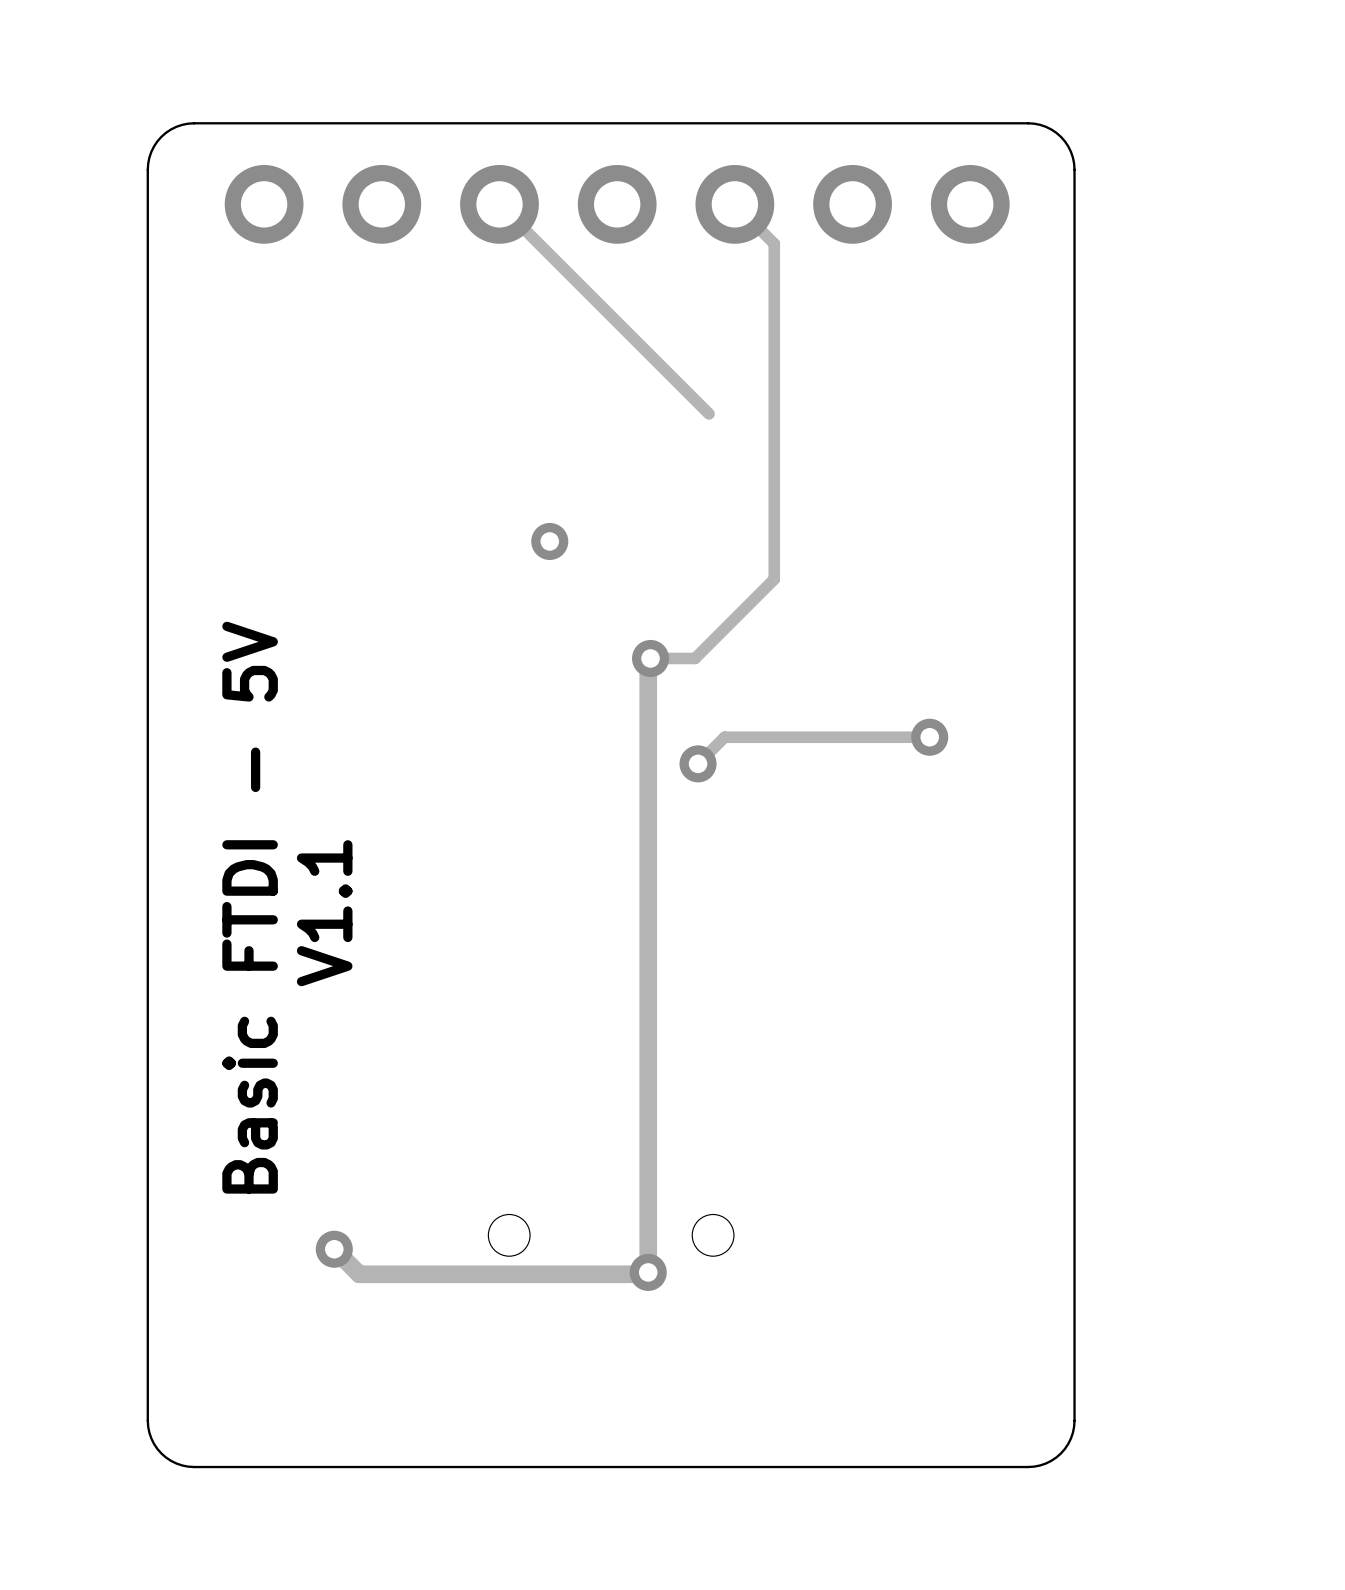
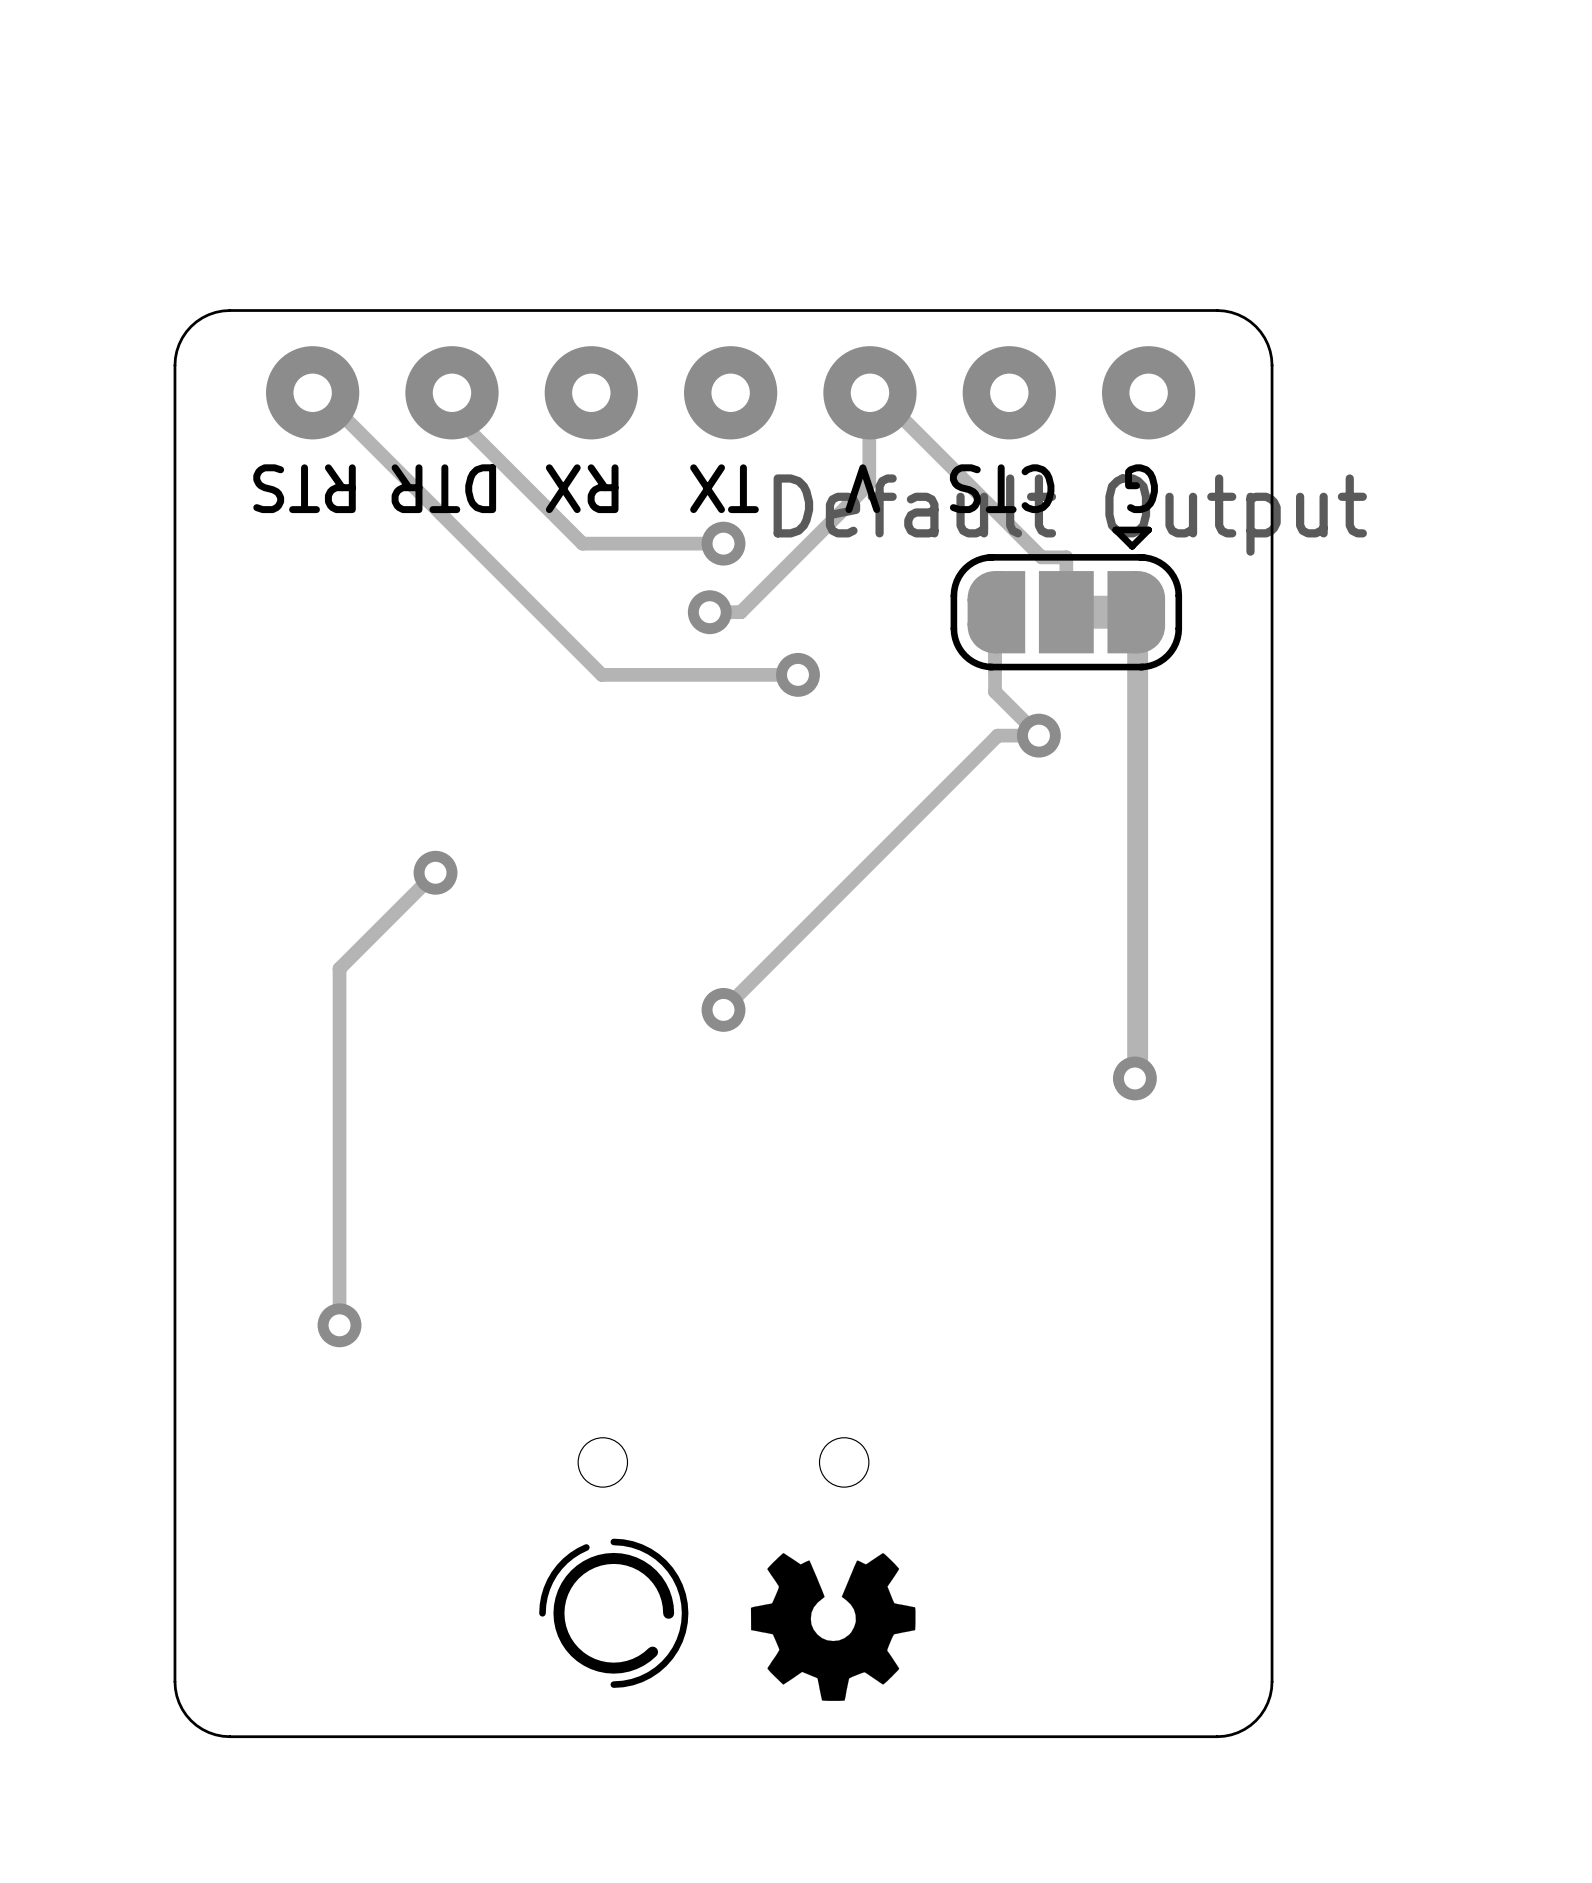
track: (499, 204) (709, 413) -> none
part: (617, 204) -> none
track: (734, 204) (774, 243) (774, 579) (695, 658) (650, 658) (648, 660) (648, 1272) (646, 1274) (359, 1274) (334, 1249) -> none
track: none -> (459, 365) (459, 420) (582, 543) (723, 543)
board edge: (1074, 308) (1072, 157) (1068, 146) (1056, 132) (1040, 124) (1028, 123) (194, 123) (182, 124) (170, 129) (161, 136) (154, 146) (148, 163) (147, 308) -> (1272, 365) (1267, 344) (1255, 326) (1238, 314) (1217, 310) (229, 310) (208, 314) (191, 326) (179, 344) (174, 365)
track: none -> (319, 392) (601, 674) (797, 674)
part: none -> (730, 392)
text: none -> RTS (304, 488)
text: none -> DTR (443, 488)
text: none -> RX (582, 488)
text: none -> TX (724, 488)
text: none -> V (862, 488)
text: none -> CTS (1002, 488)
text: none -> G (1141, 488)
via: none -> (723, 543)
track: none -> (1066, 581) (1066, 612) (1066, 557) (1041, 557) (877, 392) (869, 400) (869, 483) (740, 612) (709, 612)
part: none -> Default Output (1066, 598)
via: none -> (709, 612)
track: none -> (995, 612) (995, 691) (1038, 735) (997, 735) (723, 1009)
track: none -> (1137, 612) (1137, 1075) (1134, 1078)
via: (549, 541) -> none
via: none -> (797, 674)
via: none -> (1038, 735)
via: (650, 658) -> none
track: none -> (435, 872) (339, 968) (339, 1325)
via: none -> (435, 872)
track: (929, 737) (724, 737) (698, 763) -> none
via: (929, 737) -> none
via: (698, 763) -> none
via: none -> (723, 1009)
text: Basic FTDI - 5V (250, 907) -> none
via: none -> (1134, 1078)
text: V1.1 (324, 913) -> none
via position: (334, 1249) -> (339, 1325)
via: (648, 1272) -> none
drawing: none -> [539, 1538, 916, 1701]

